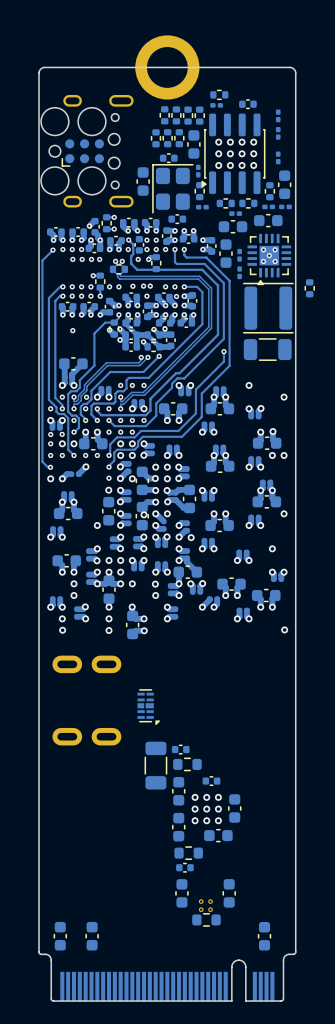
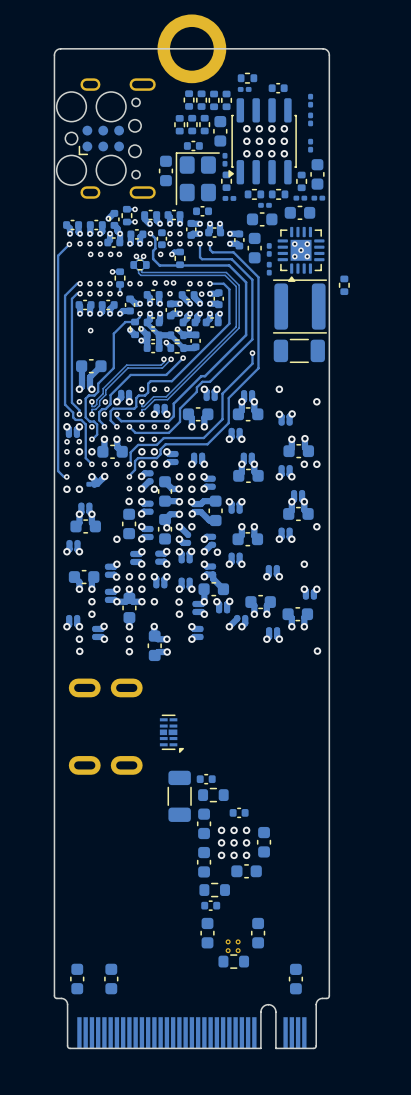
track: none -> (91, 476) (94, 479) (94, 484)
via: none -> (91, 476)
track: (71, 474) (67, 474) (62, 478) -> none

